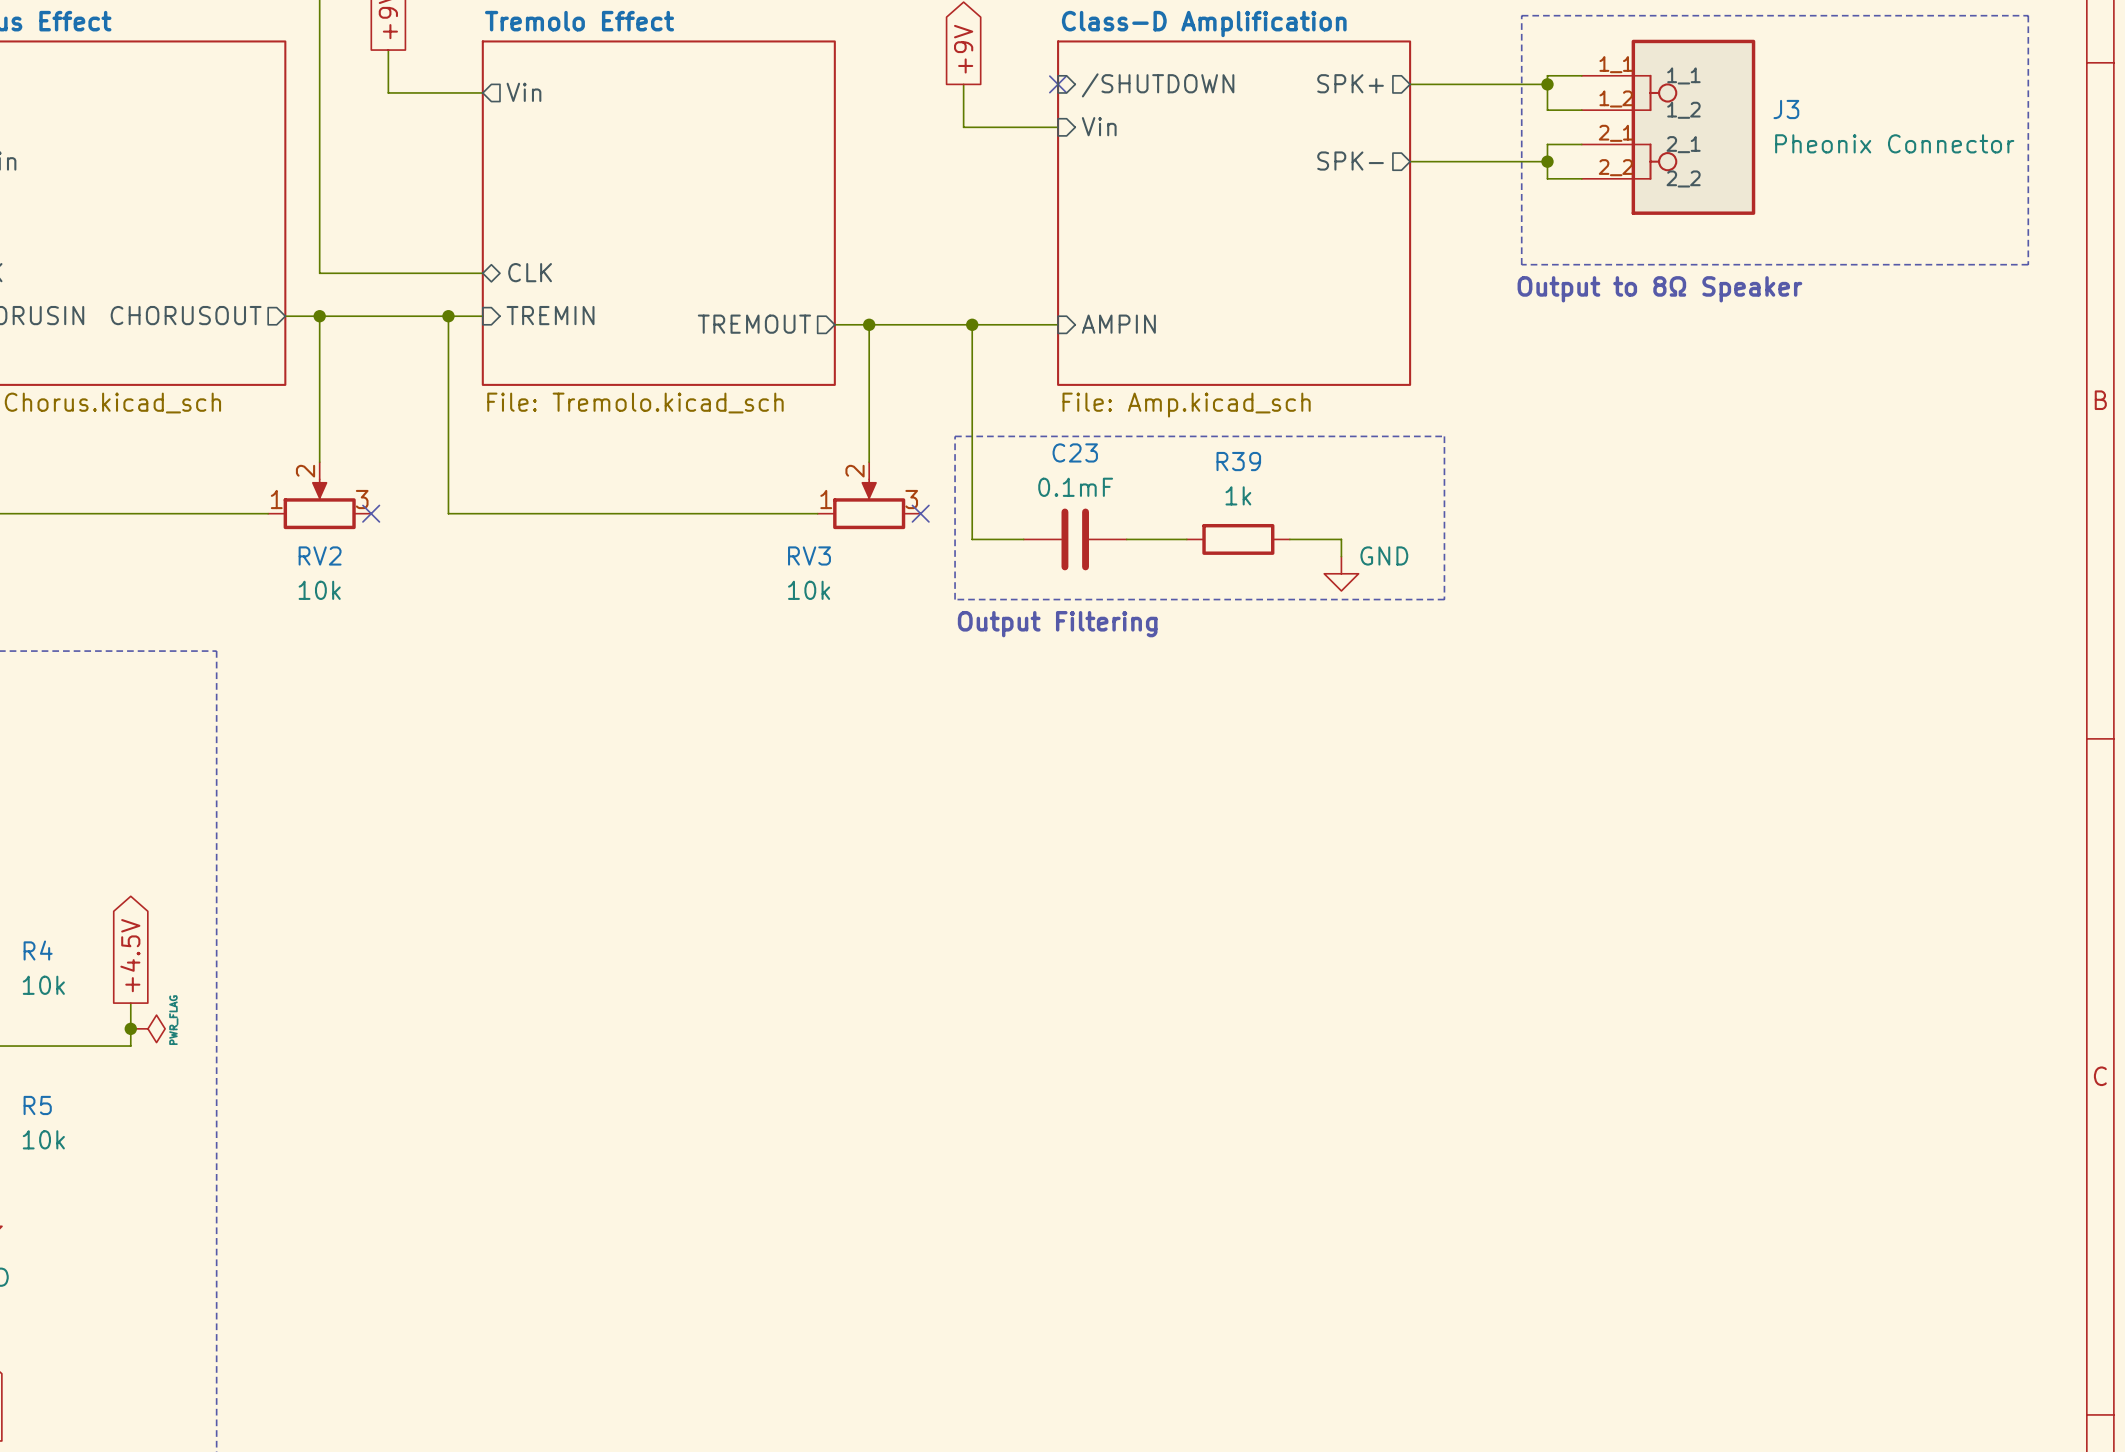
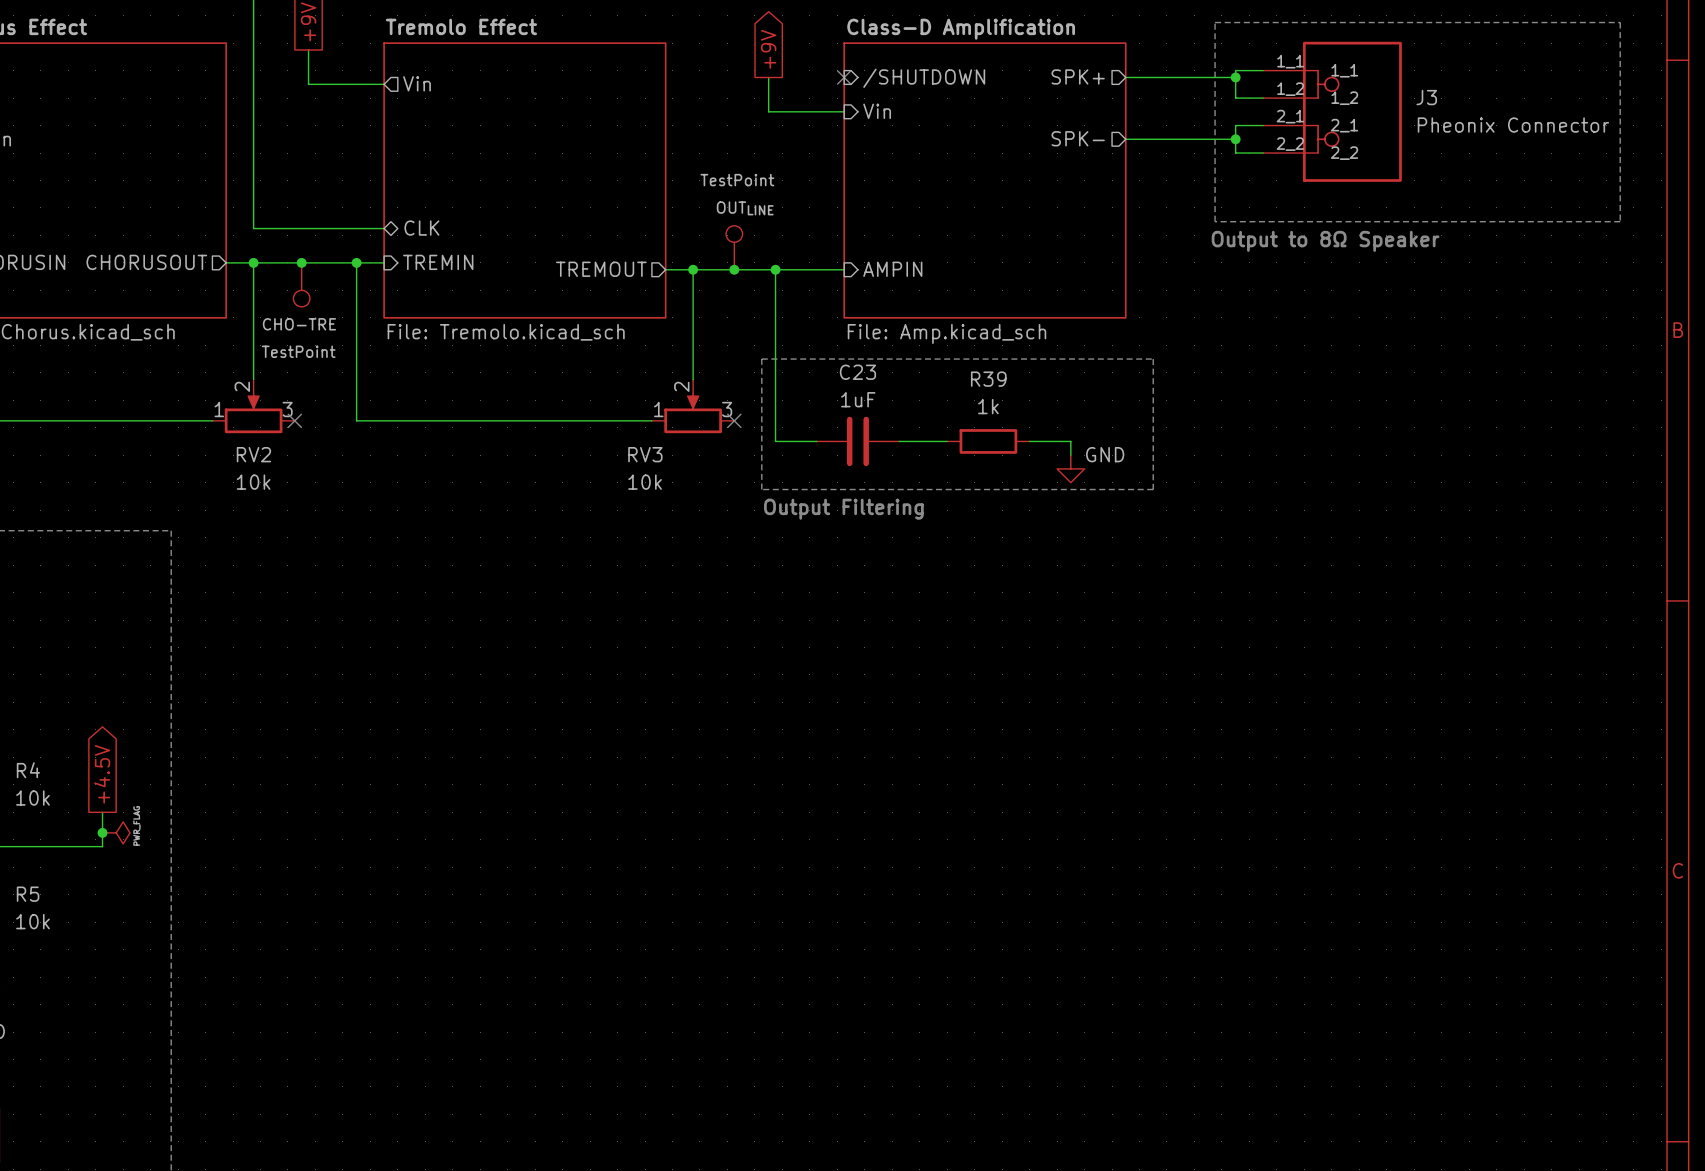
OUTLINE: none -> TestPoint (734, 247)
junction: none -> (301, 262)
junction: none -> (734, 269)
CHO-TRE: none -> TestPoint (301, 284)
C23 value: 0.1mF (1075, 487) -> 1uF (858, 399)

